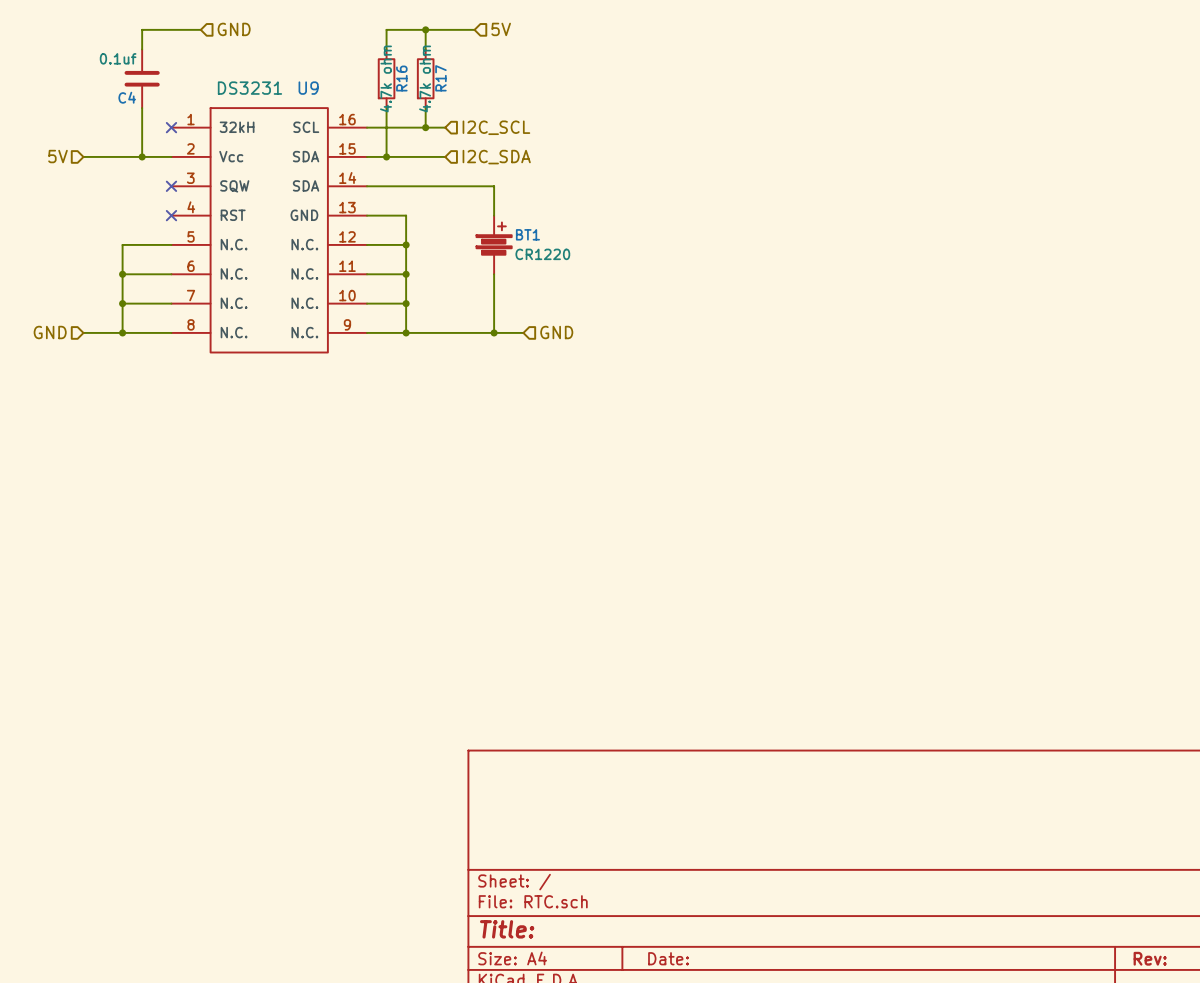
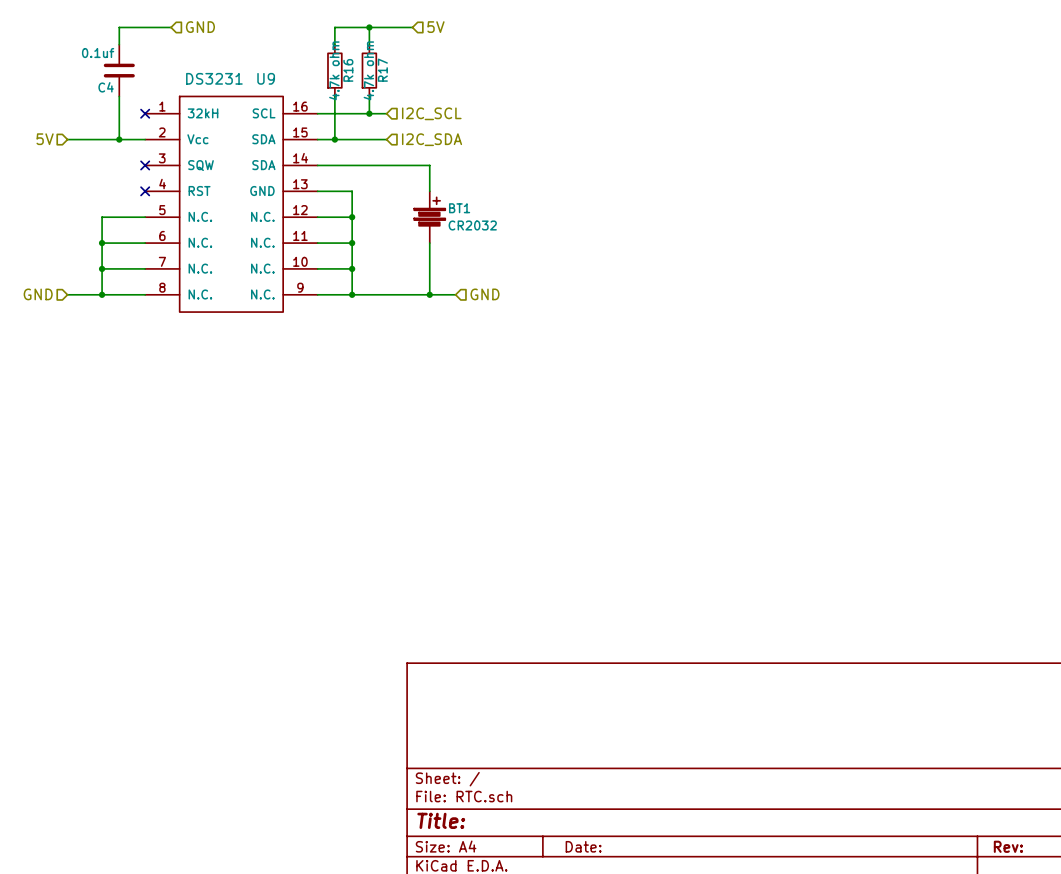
BT1 value: CR1220 (542, 254) -> CR2032 (472, 225)

